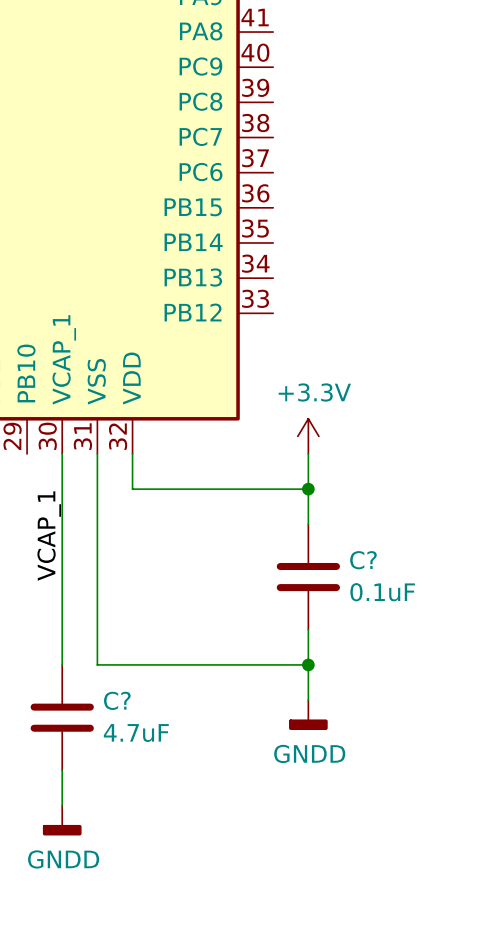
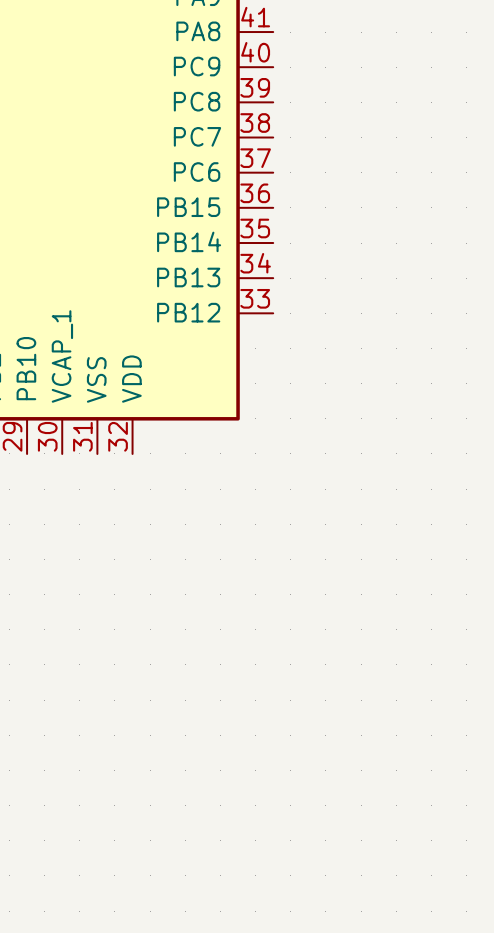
power symbol: +3.3V (308, 436) -> none
wire: (62, 453) (62, 664) -> none
wire: (97, 453) (97, 664) (308, 664) -> none
wire: (132, 453) (132, 489) (308, 489) -> none
wire: (308, 453) (308, 524) -> none
junction: (308, 489) -> none
label: VCAP_1 (49, 536) -> none
C?: 0.1uF (308, 577) -> none
wire: (308, 629) (308, 700) -> none
junction: (308, 664) -> none
power symbol: GNDD (308, 715) -> none
C?: 4.7uF (62, 717) -> none
wire: (62, 770) (62, 805) -> none
power symbol: GNDD (62, 820) -> none

